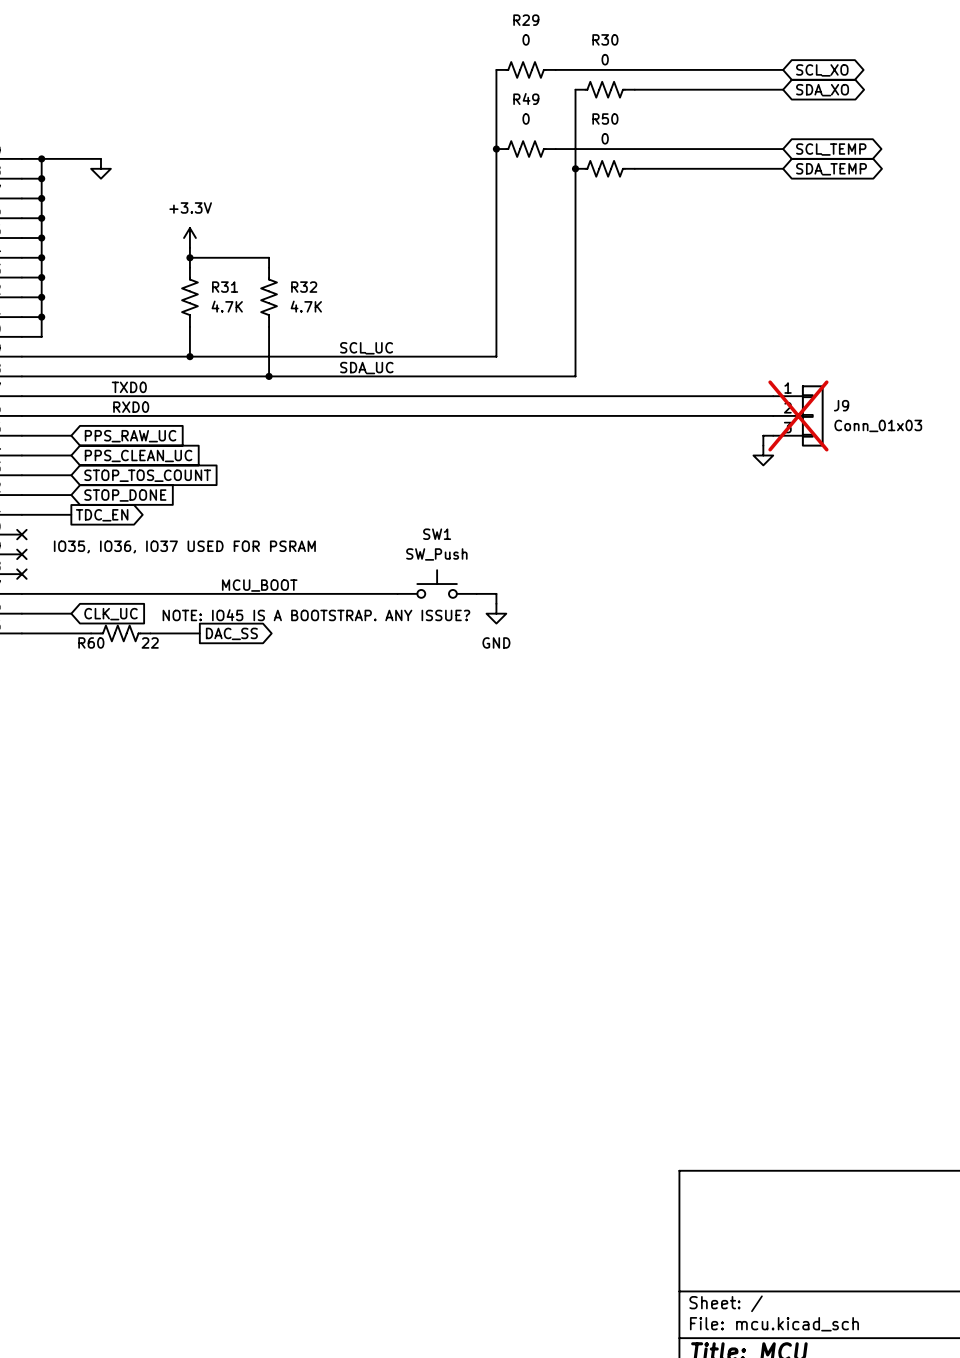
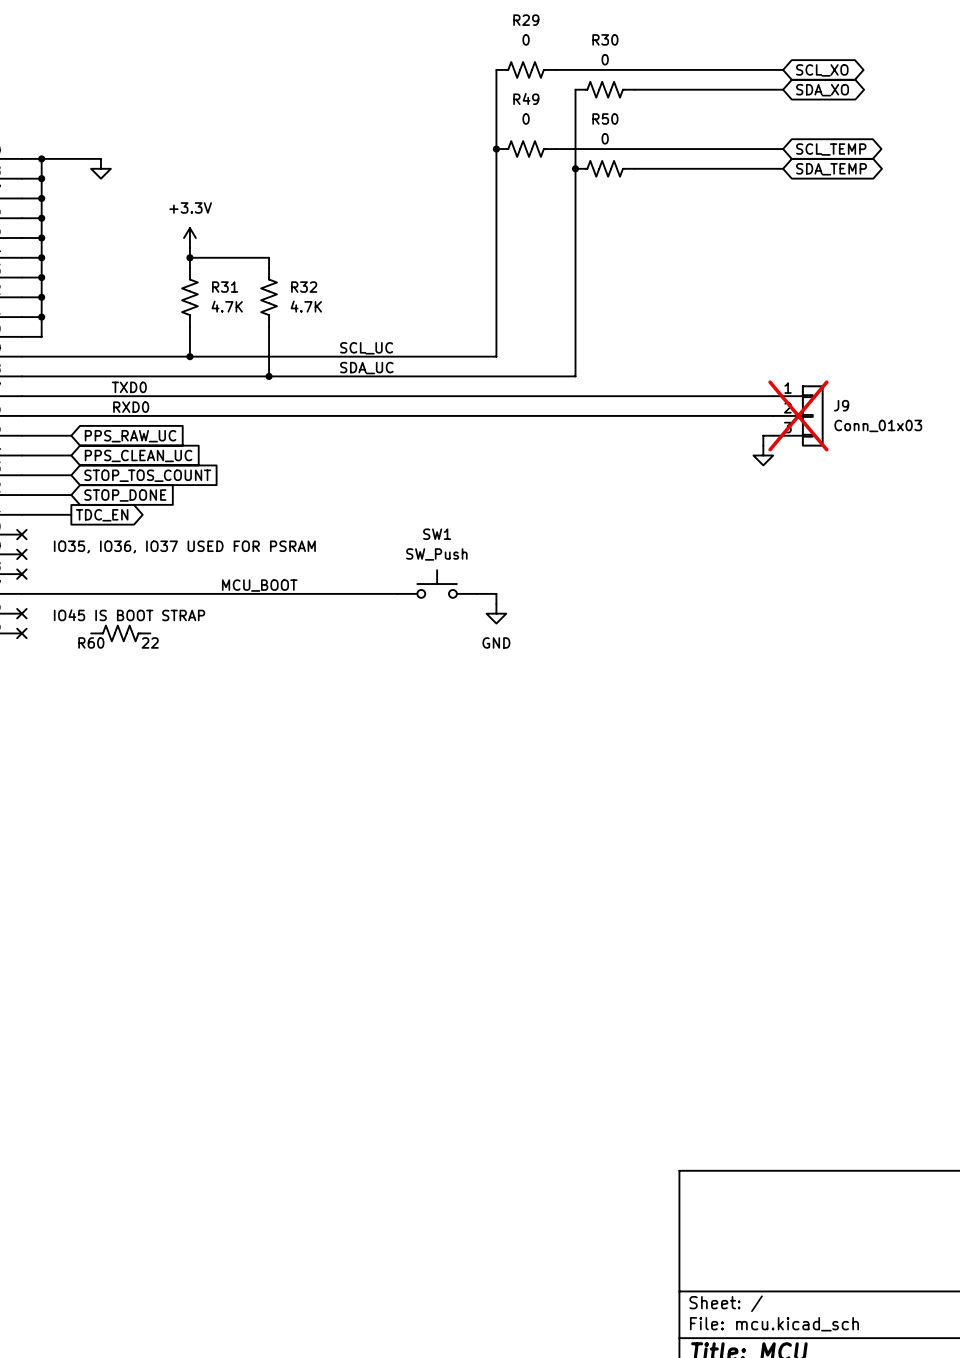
wire: (21, 613) (71, 613) -> none
no-connect mark: none -> (21, 613)
global label: CLK_UC (111, 614) -> none
text: NOTE: IO45 IS A BOOTSTRAP. ANY ISSUE? (316, 615) -> IO45 IS BOOT STRAP (129, 615)
wire: (21, 633) (91, 633) -> none
no-connect mark: none -> (21, 633)
wire: (150, 633) (199, 633) -> none
global label: DAC_SS (231, 633) -> none

